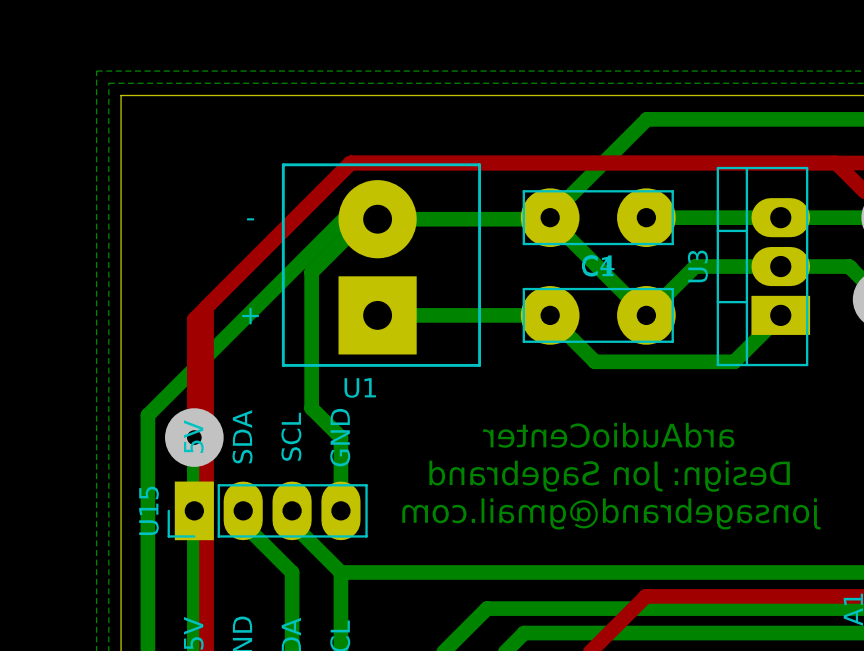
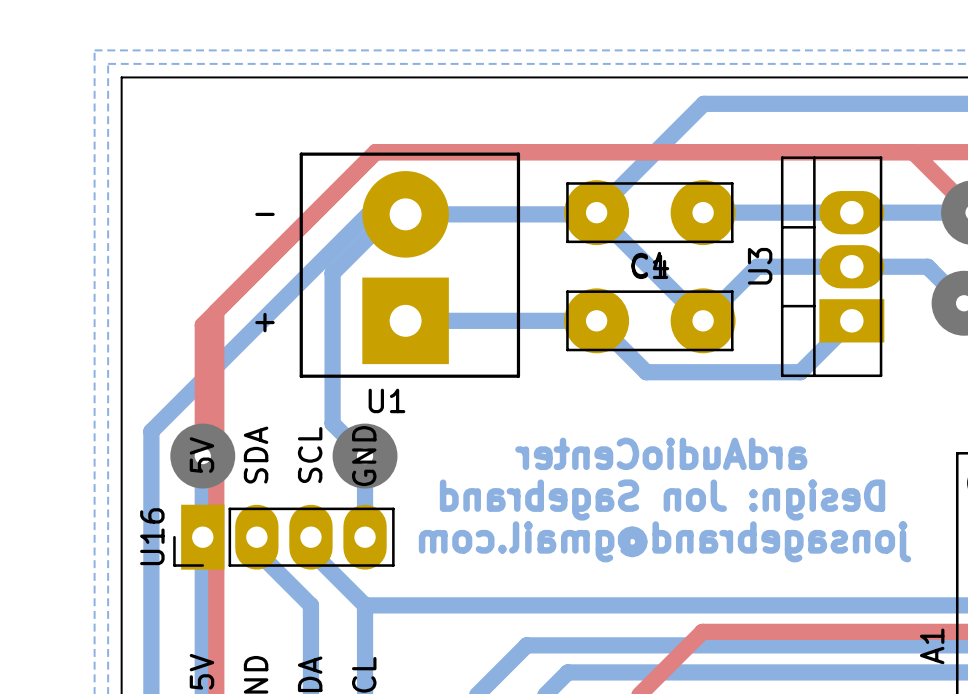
via: none -> (365, 456)
U15 name: U15 (148, 510) -> U16 (152, 536)

